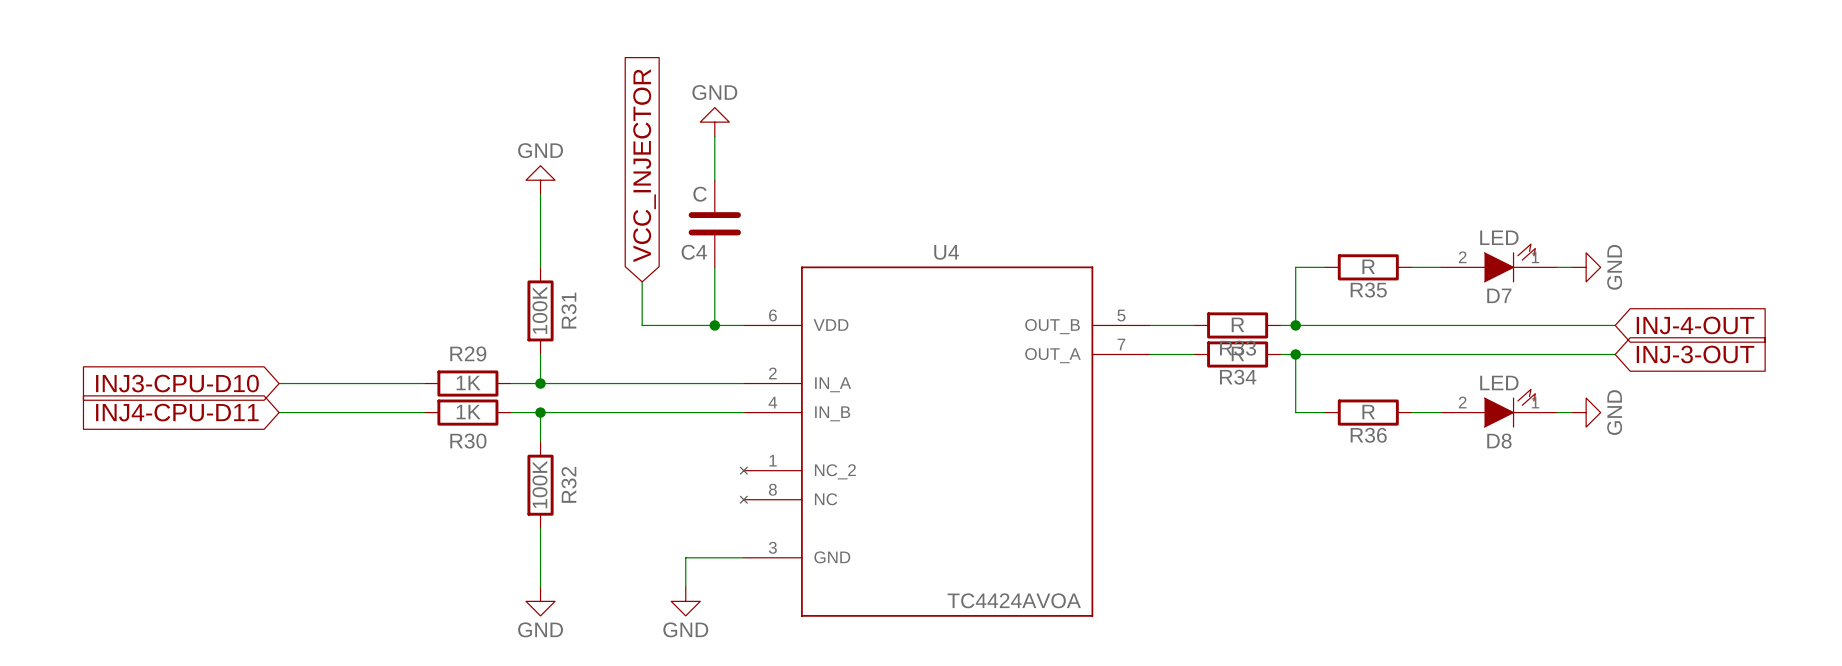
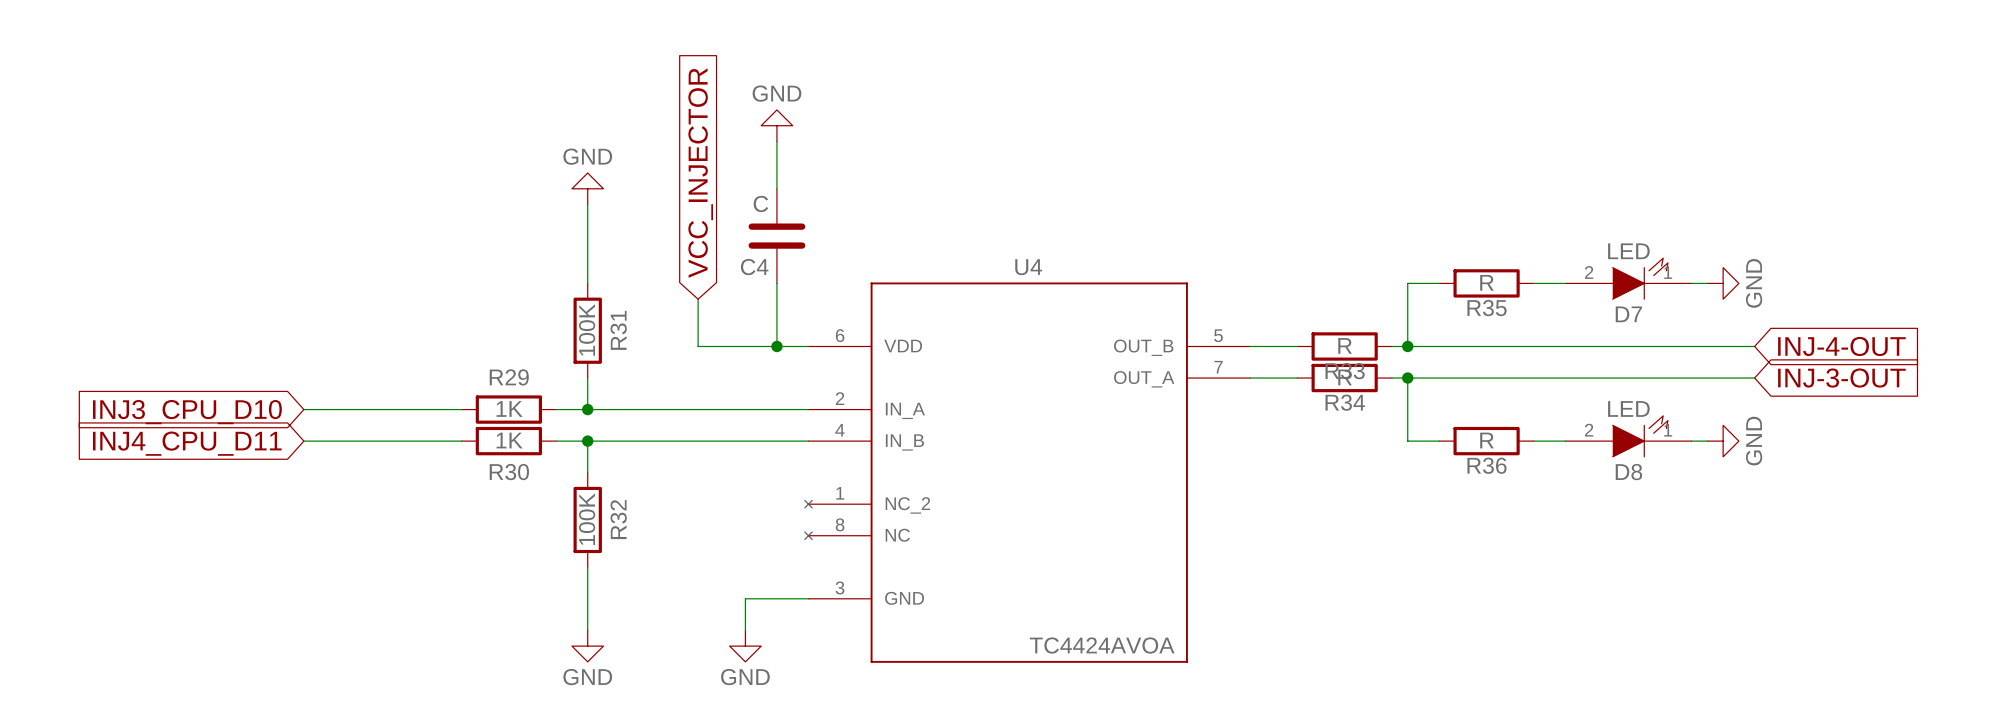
global label: INJ3-CPU-D10 (177, 383) -> INJ3_CPU_D10 (187, 412)
global label: INJ4-CPU-D11 (177, 412) -> INJ4_CPU_D11 (187, 443)

